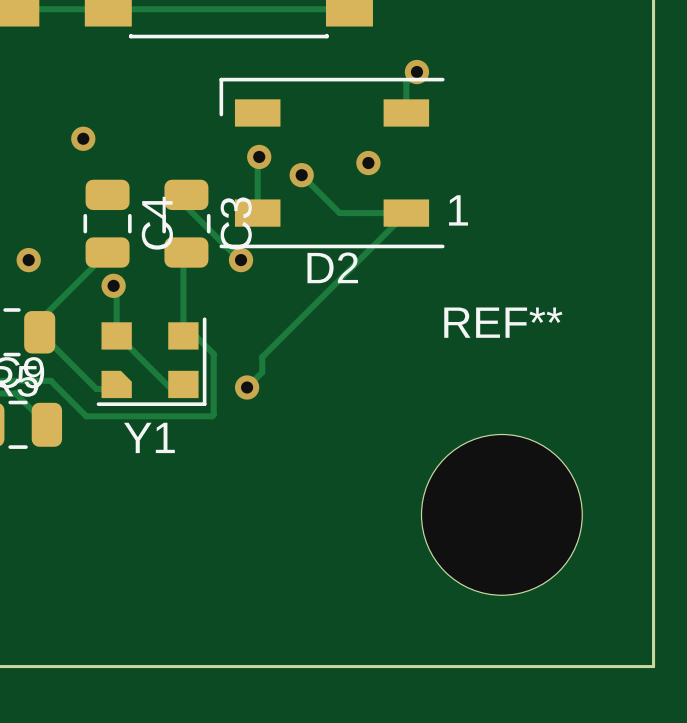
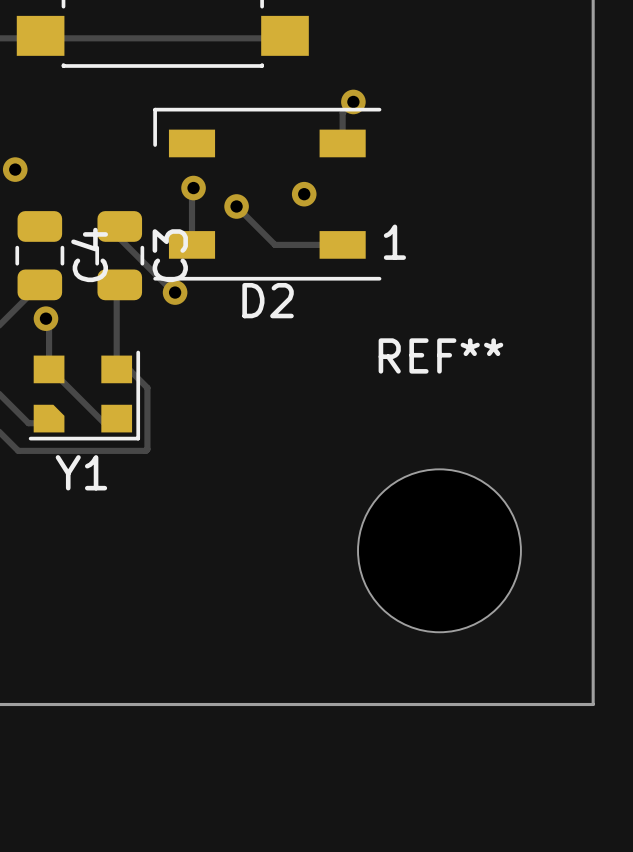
track: (406, 213) (262, 357) (262, 372) (247, 387) -> none
via: (247, 387) -> none

